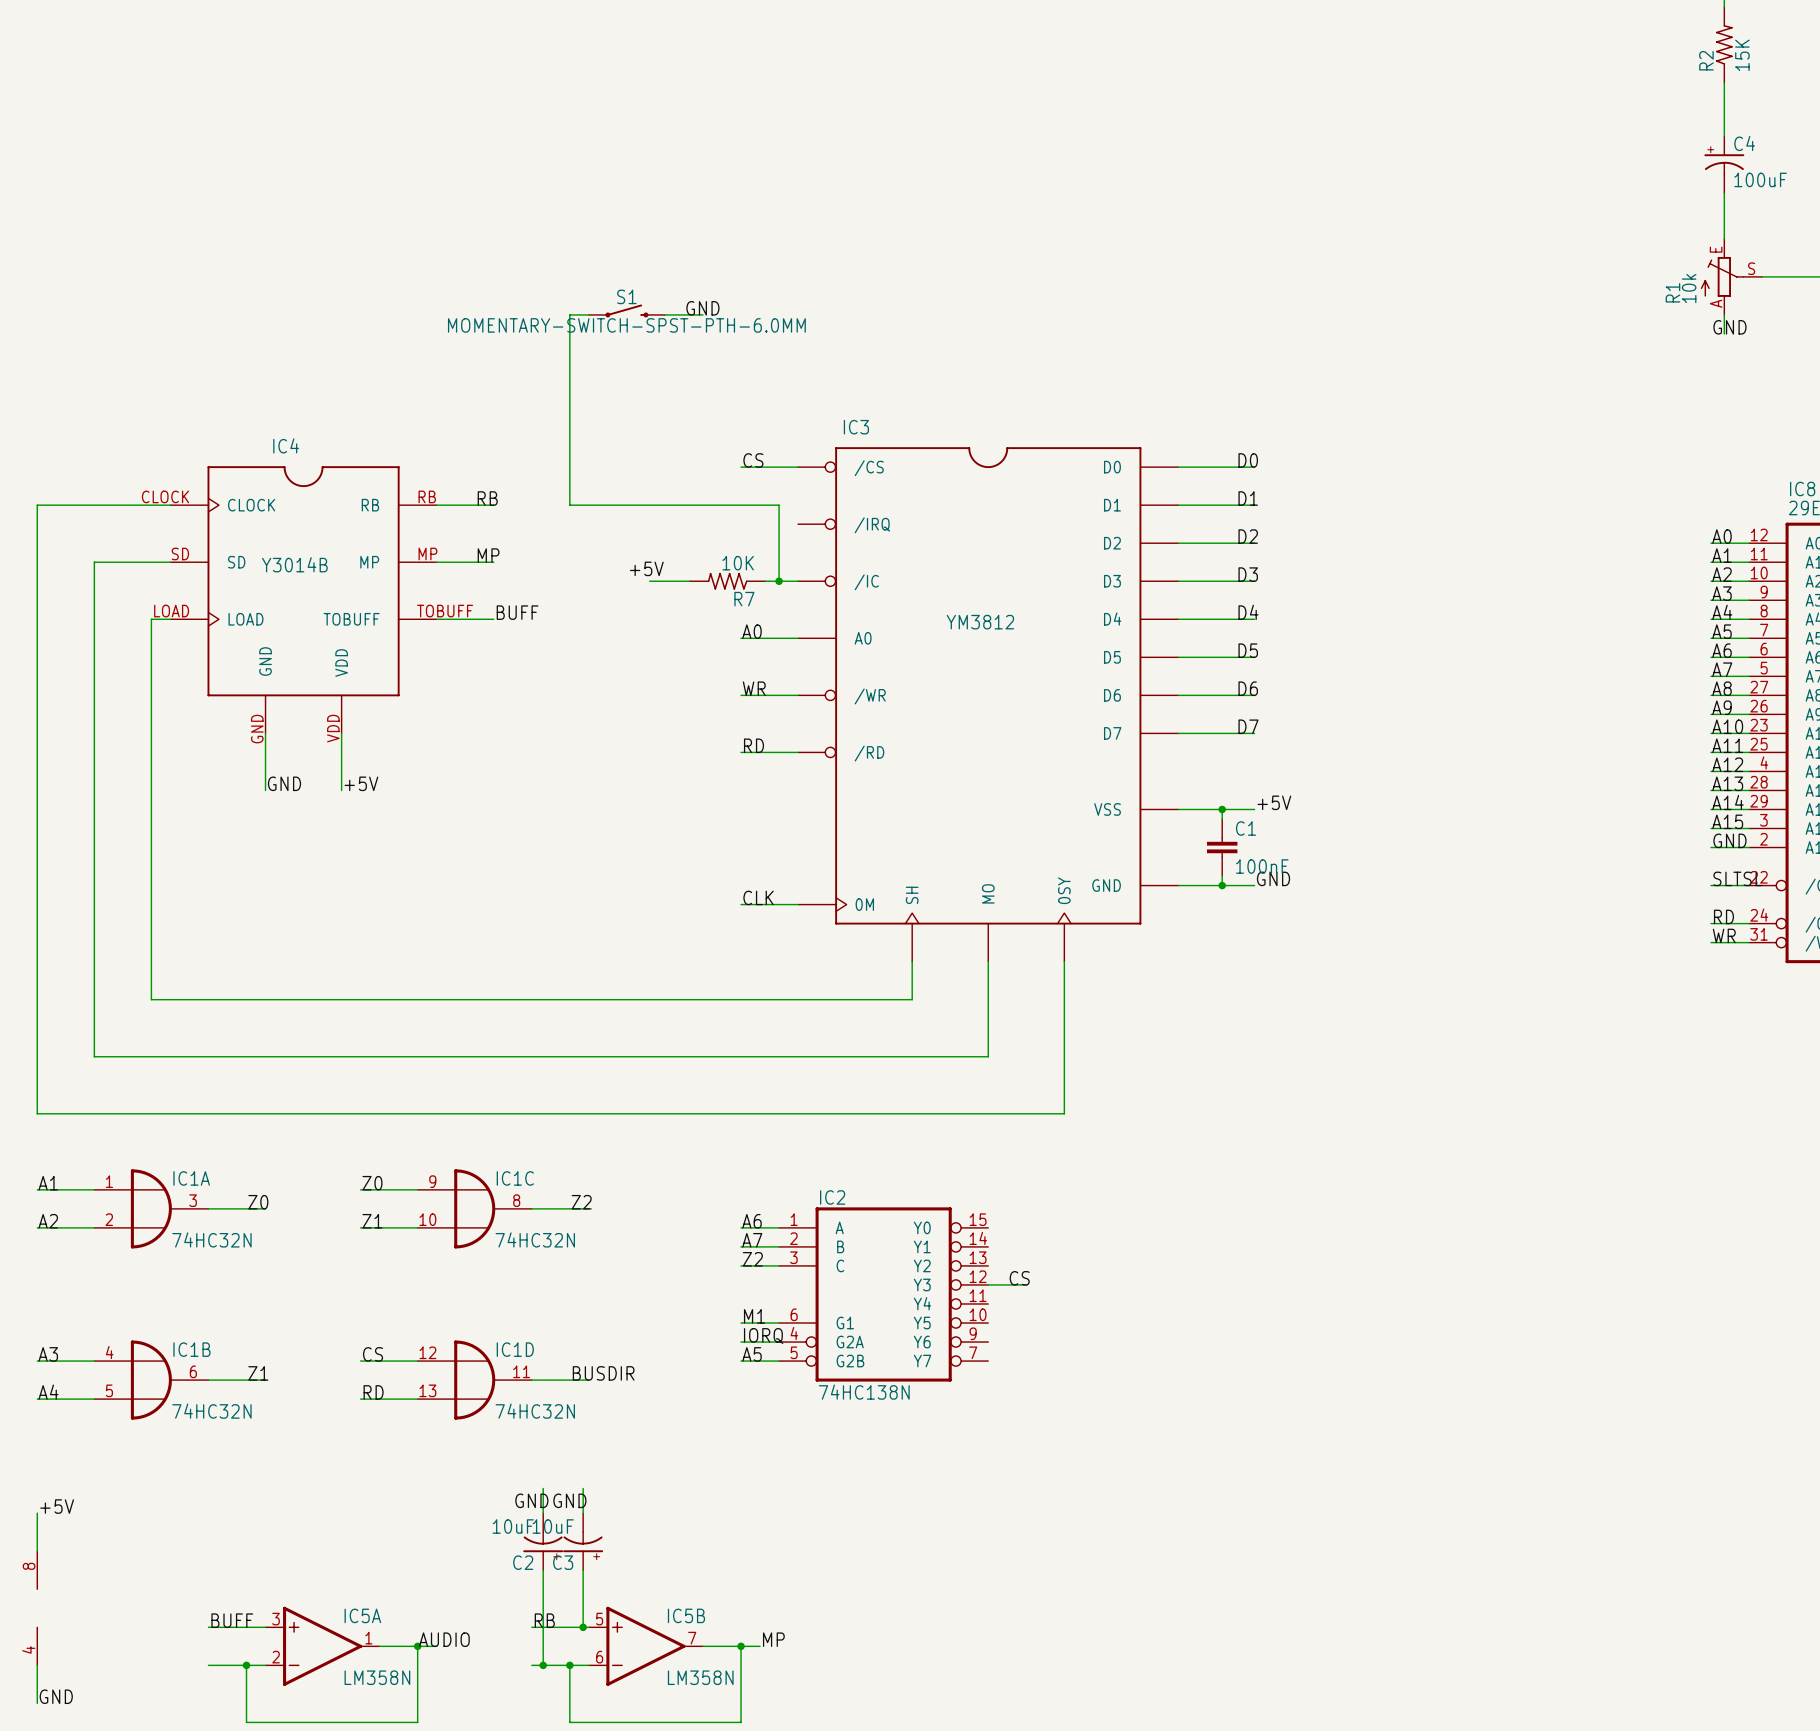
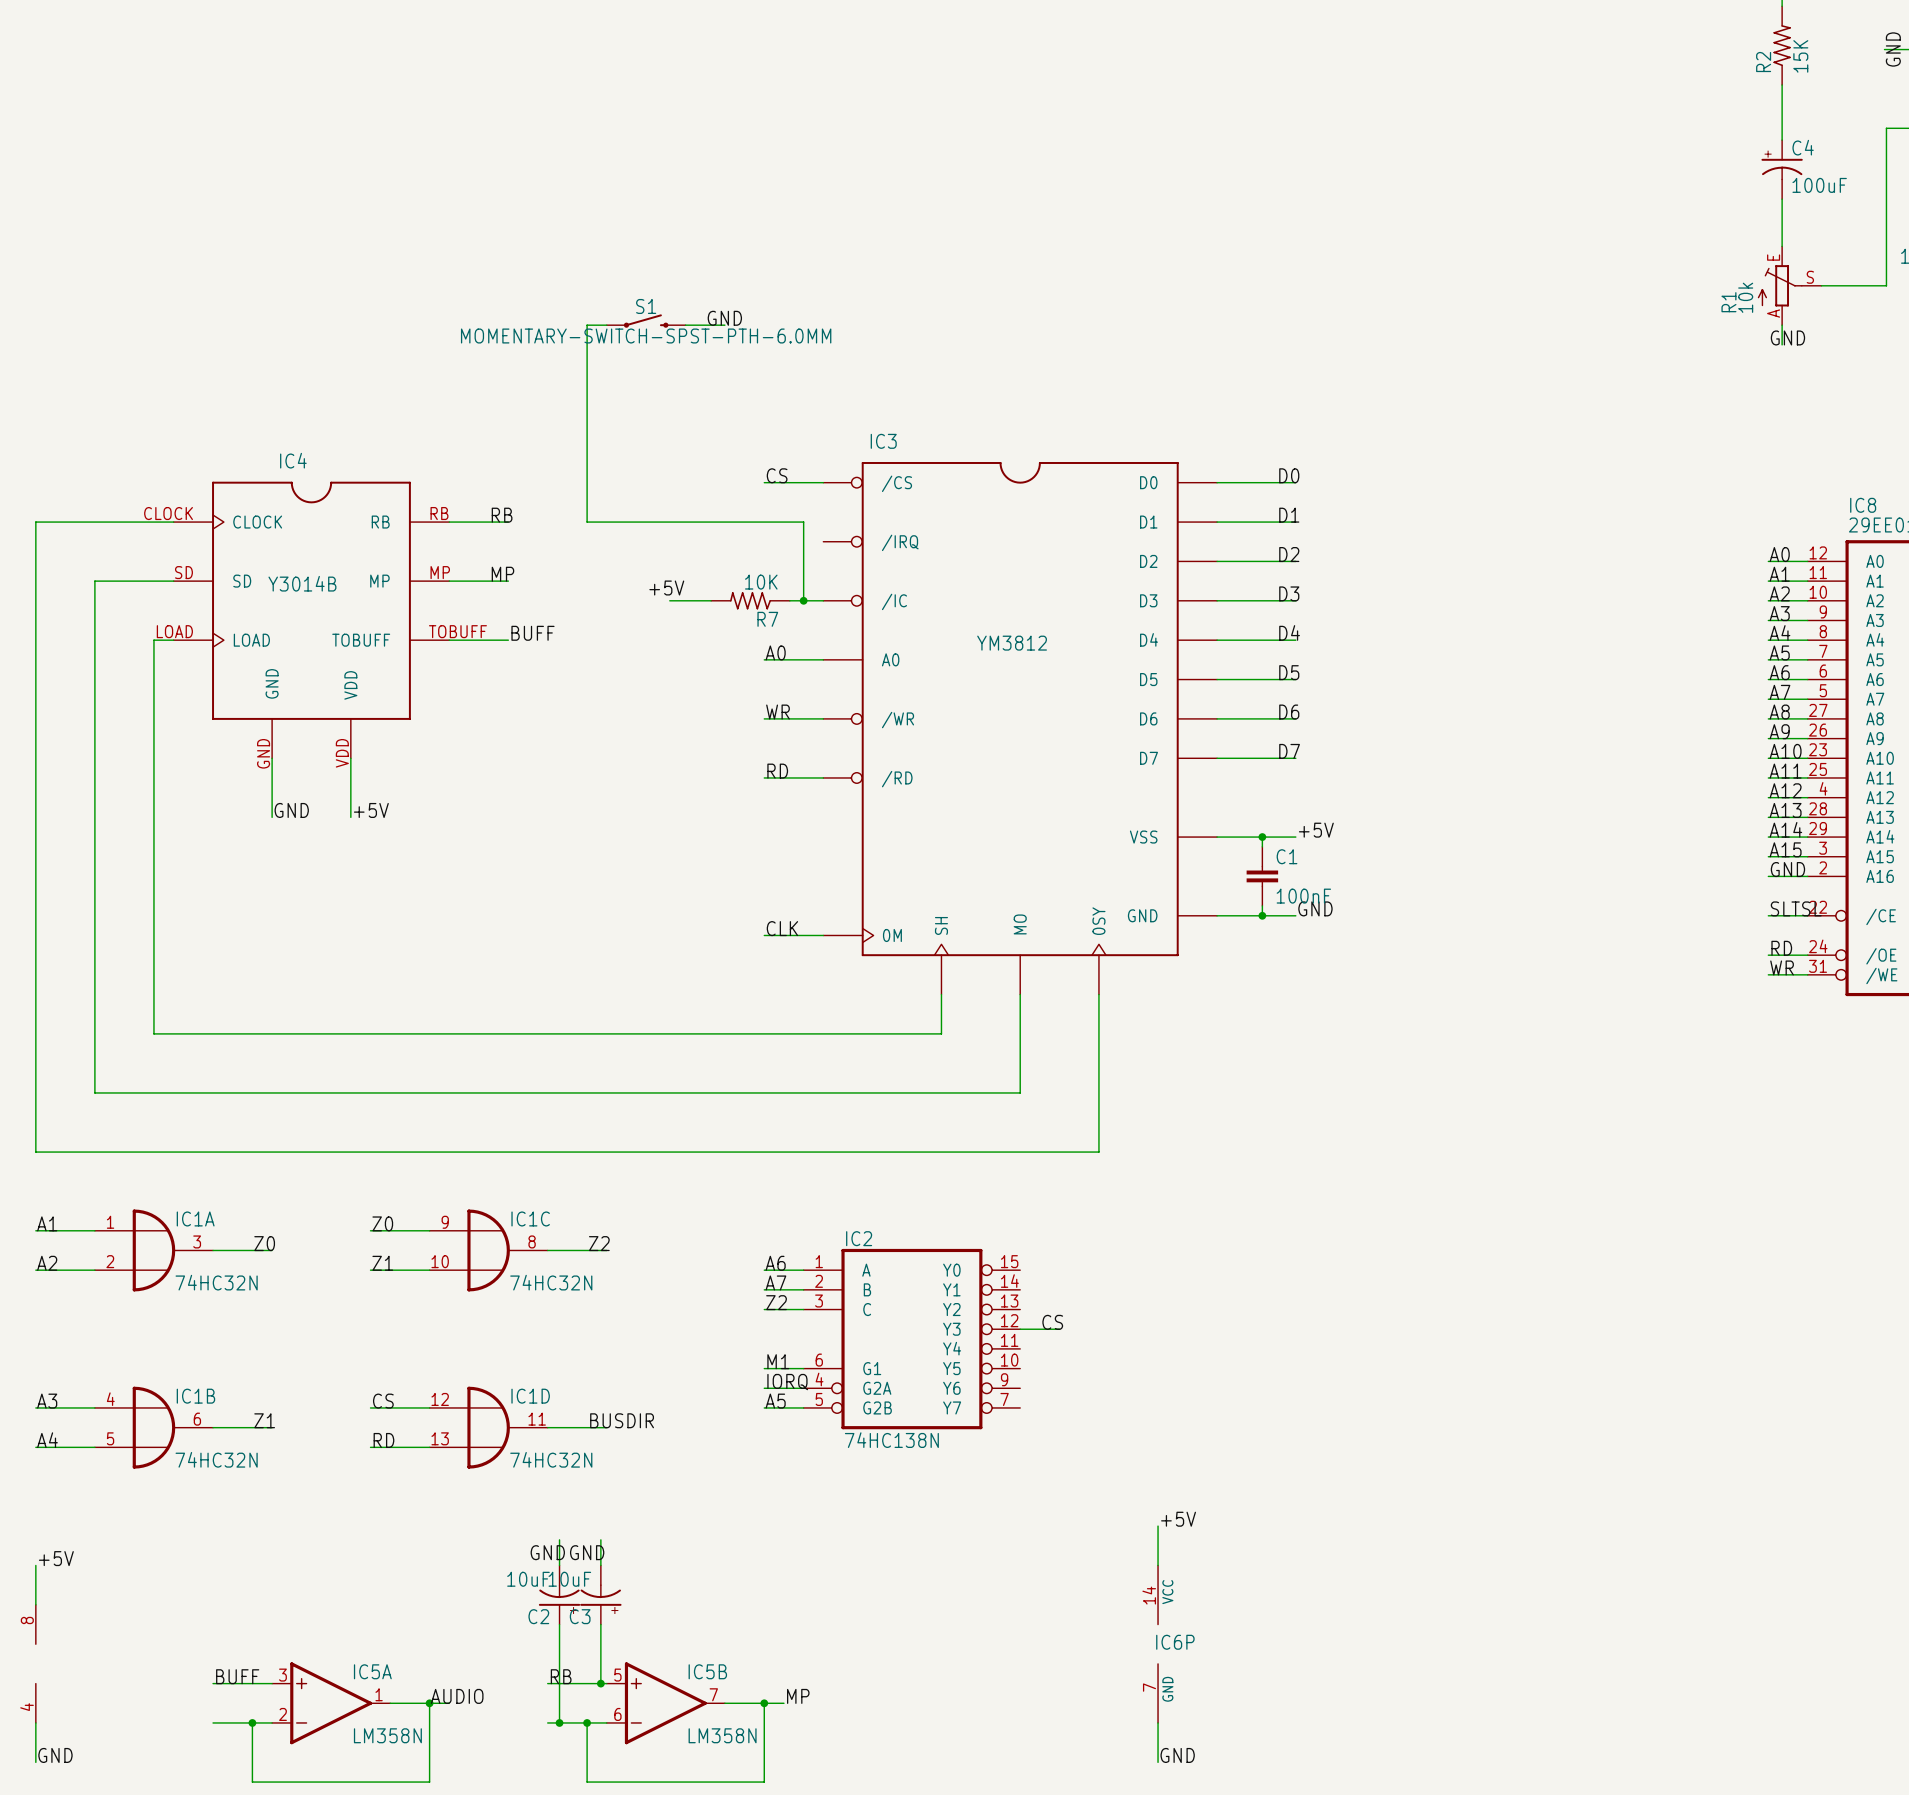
label: none -> +5V (1178, 1519)
wire: none -> (1158, 1526) (1158, 1565)
IC6P: none -> (1158, 1644)
wire: none -> (1158, 1722) (1158, 1762)
label: none -> GND (1177, 1755)

